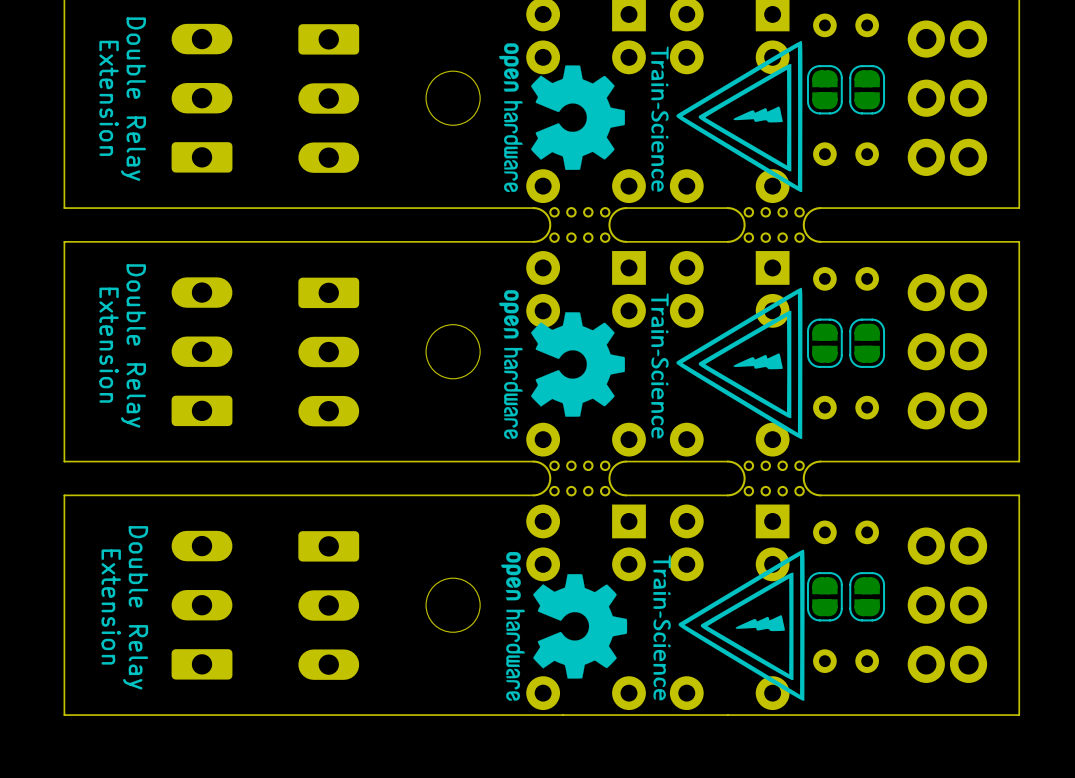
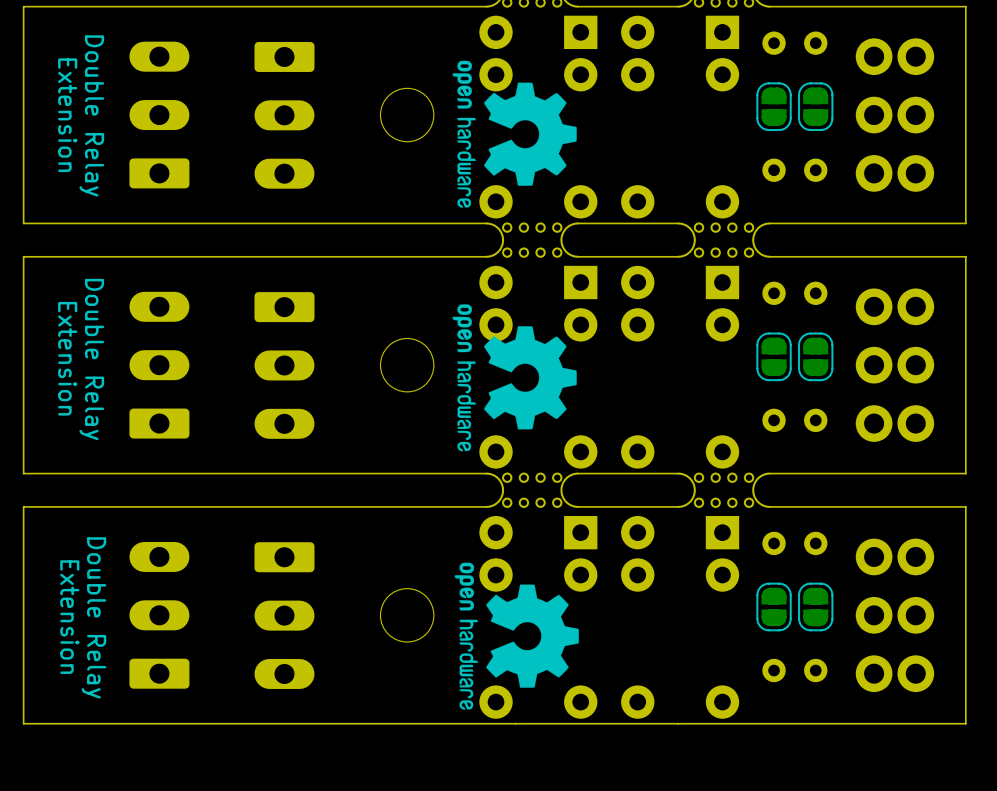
drawing: [651, 40, 803, 193] -> none
drawing: [651, 287, 803, 439] -> none
drawing: [653, 549, 805, 701] -> none

